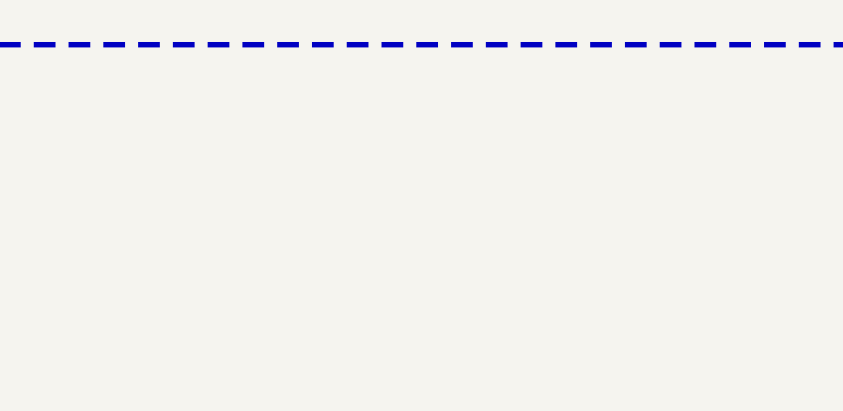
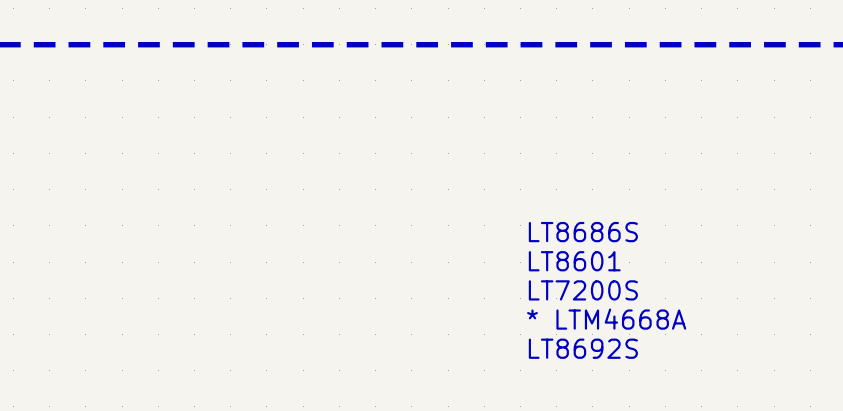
text: none -> LT8686S (583, 232)
text: none -> LT8601 (574, 261)
text: none -> LT7200S (583, 290)
text: none -> * LTM4668A (606, 319)
text: none -> LT8692S (583, 348)

